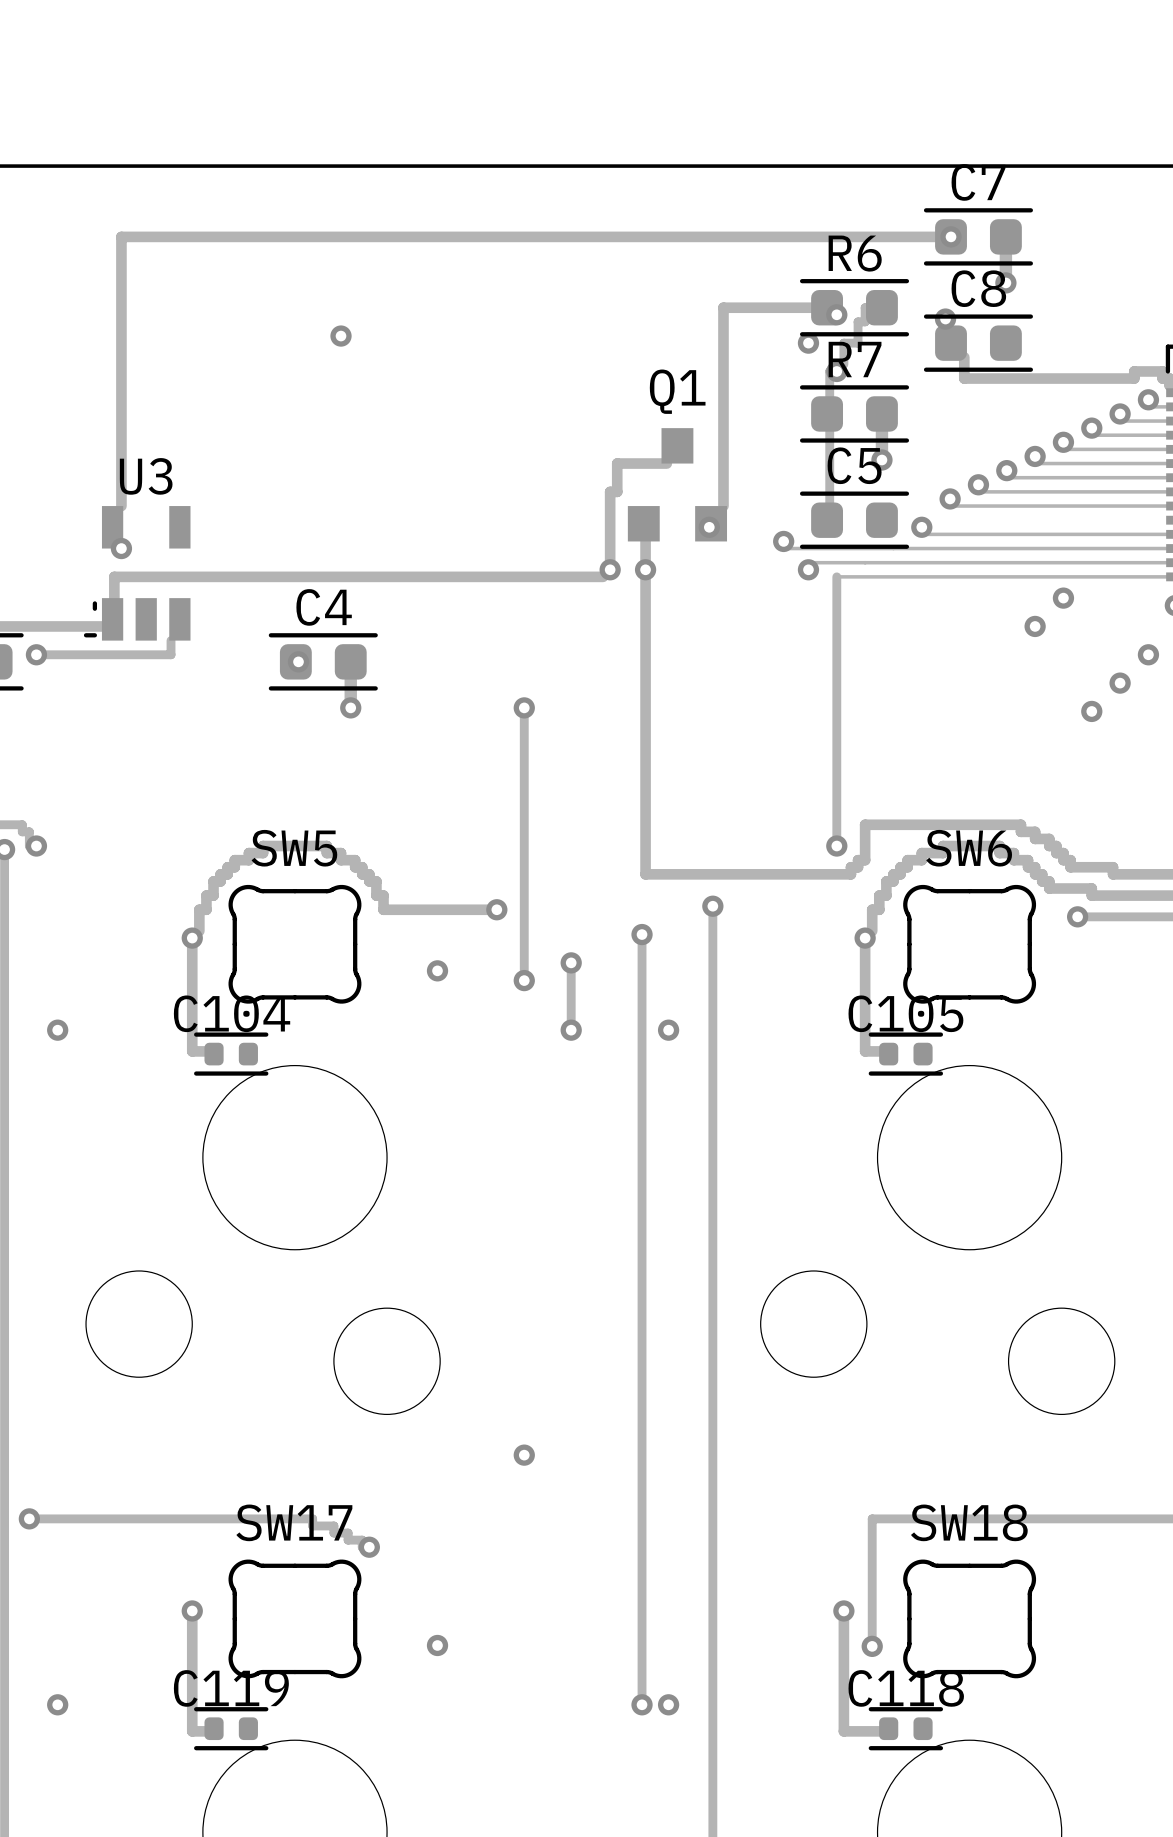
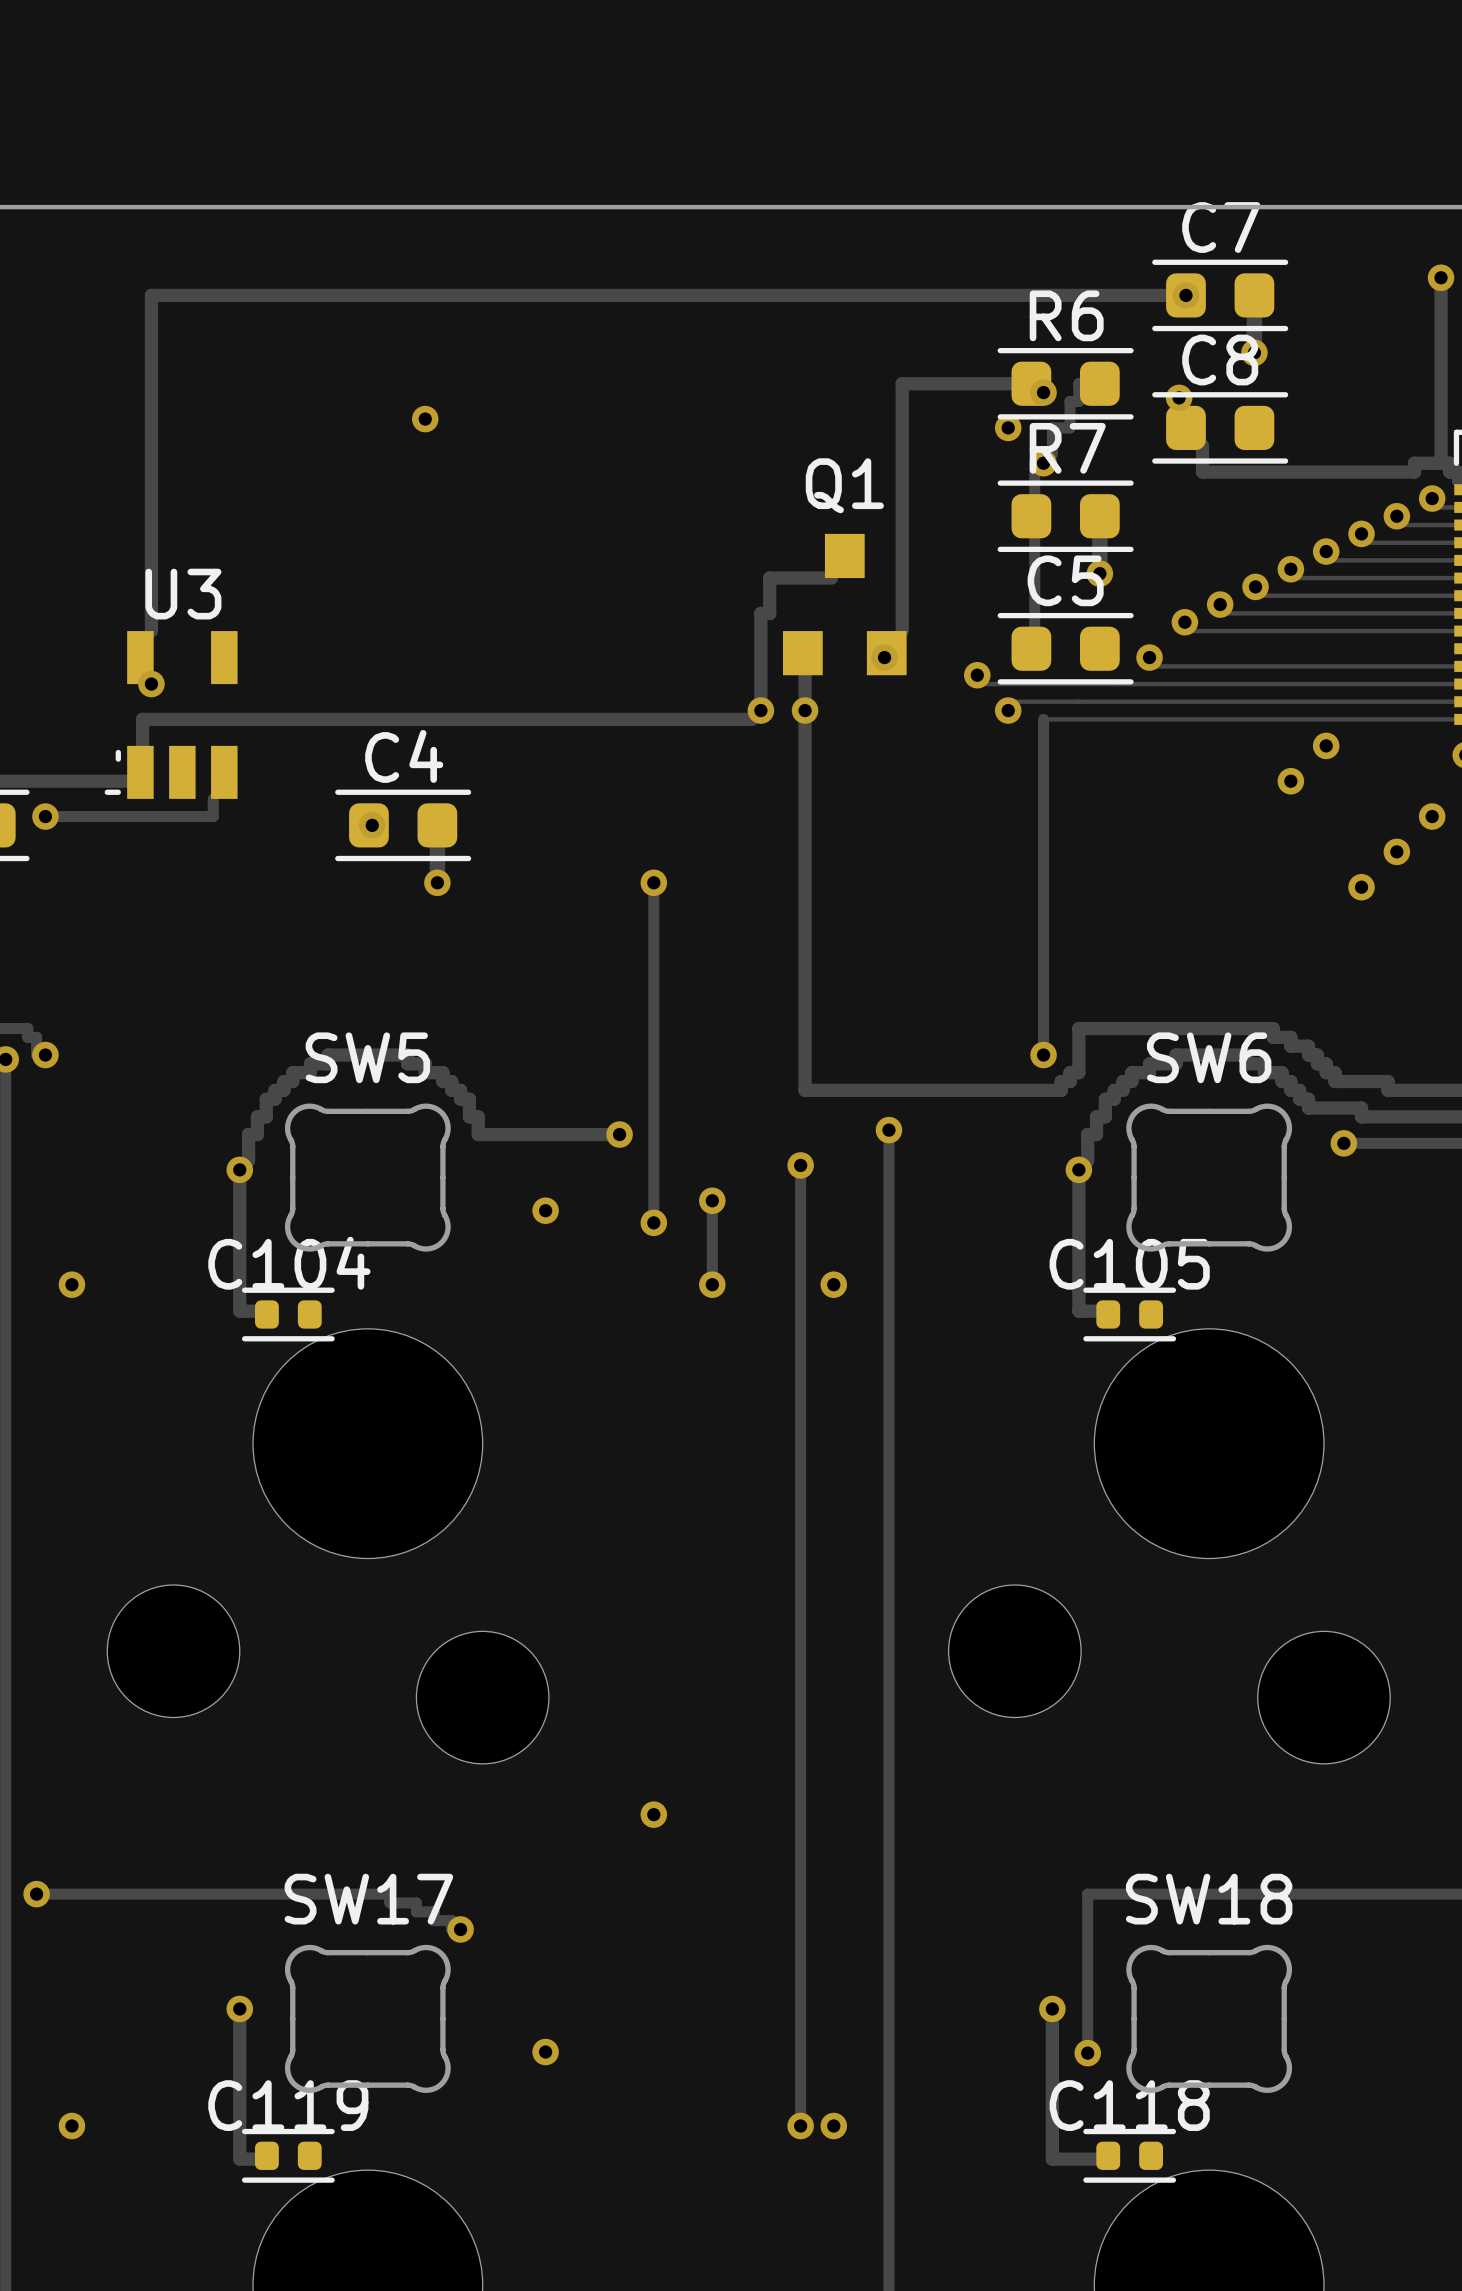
track: none -> (1441, 277) (1441, 463)
via: none -> (1441, 277)

